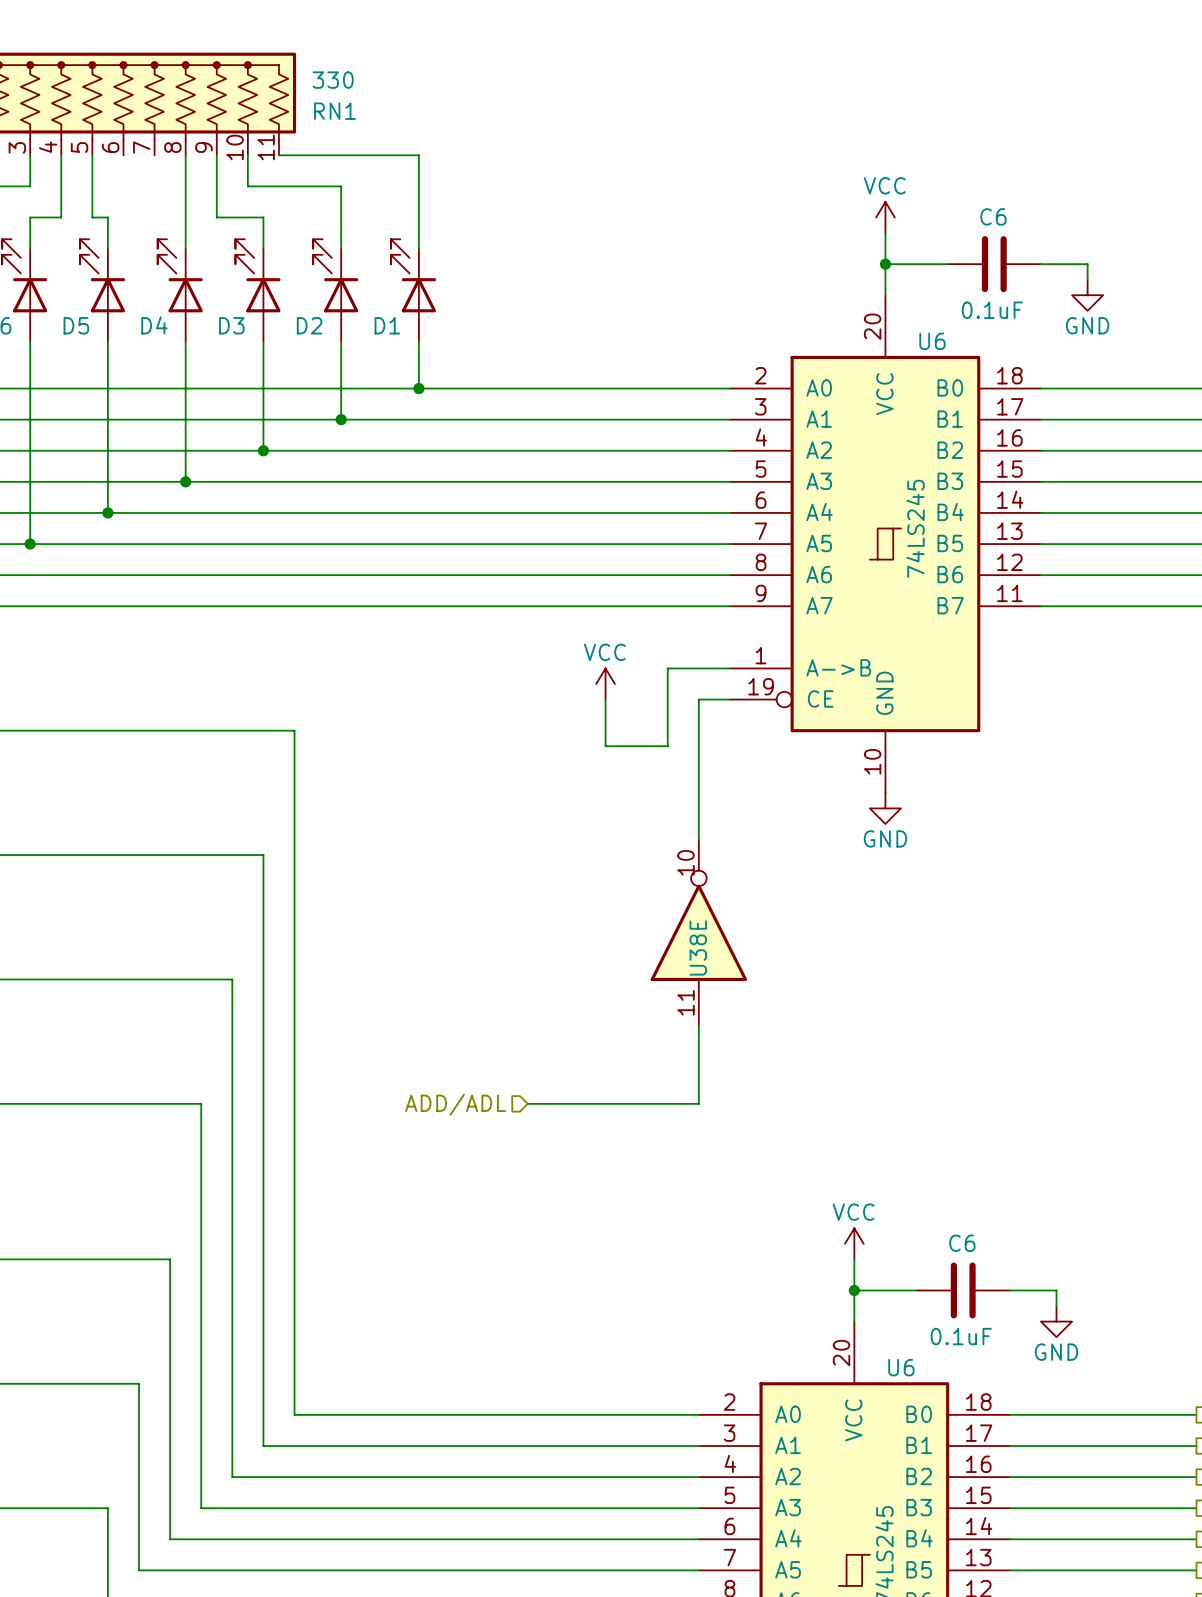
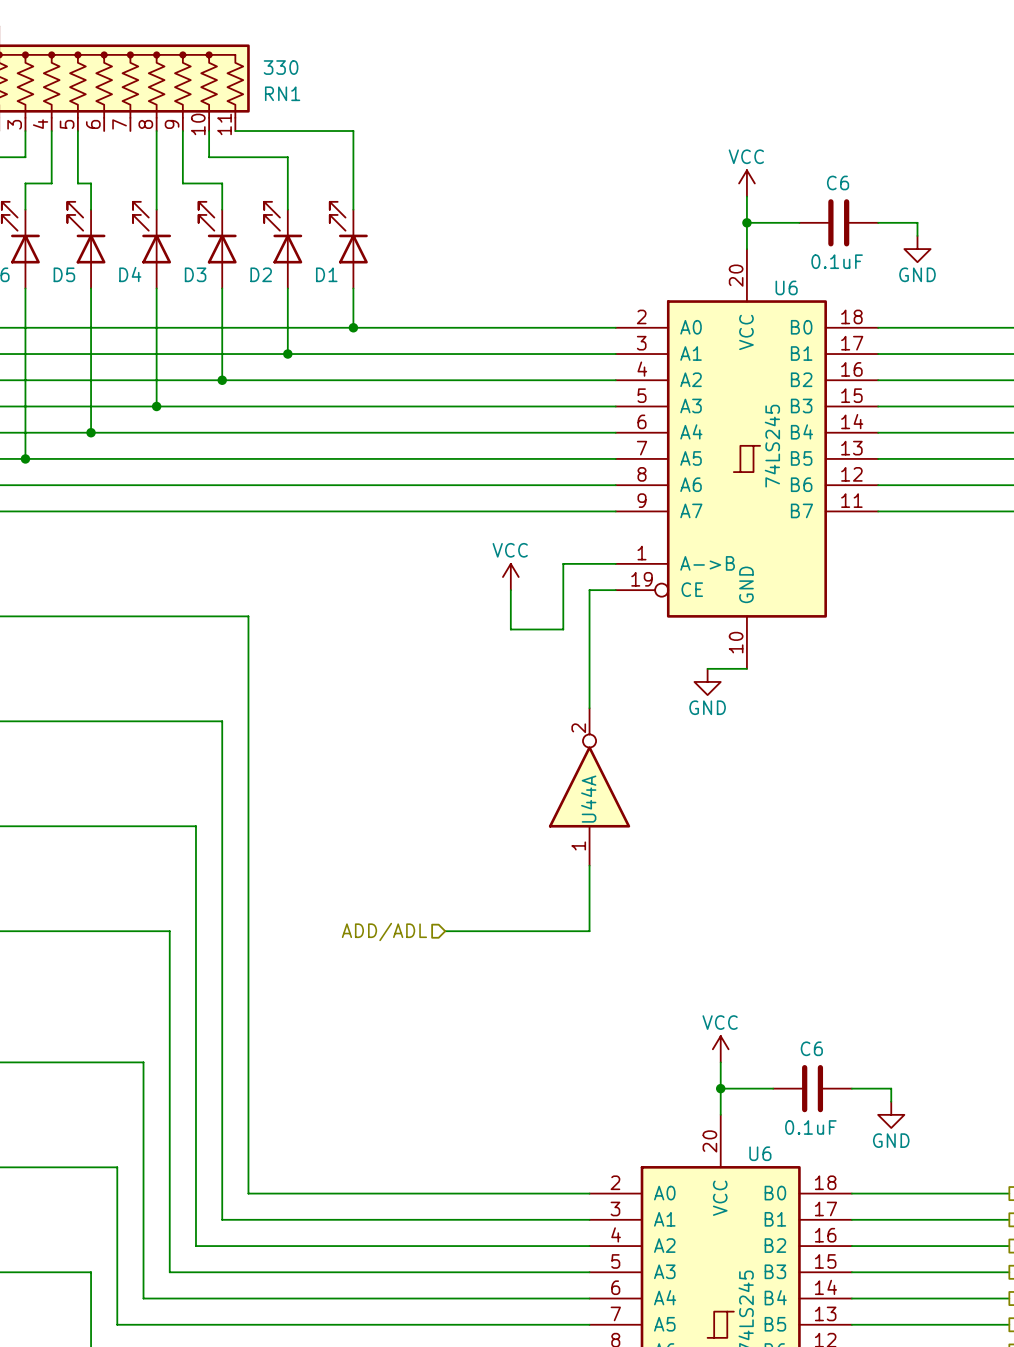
wire: none -> (707, 668) (746, 668)
power symbol position: GND (885, 808) -> GND (707, 681)
U38E pin number: 10 (686, 862) -> 2 (578, 728)
U38E name: U38E (698, 947) -> U44A (588, 799)
U38E pin number: 11 (686, 1002) -> 1 (578, 845)

